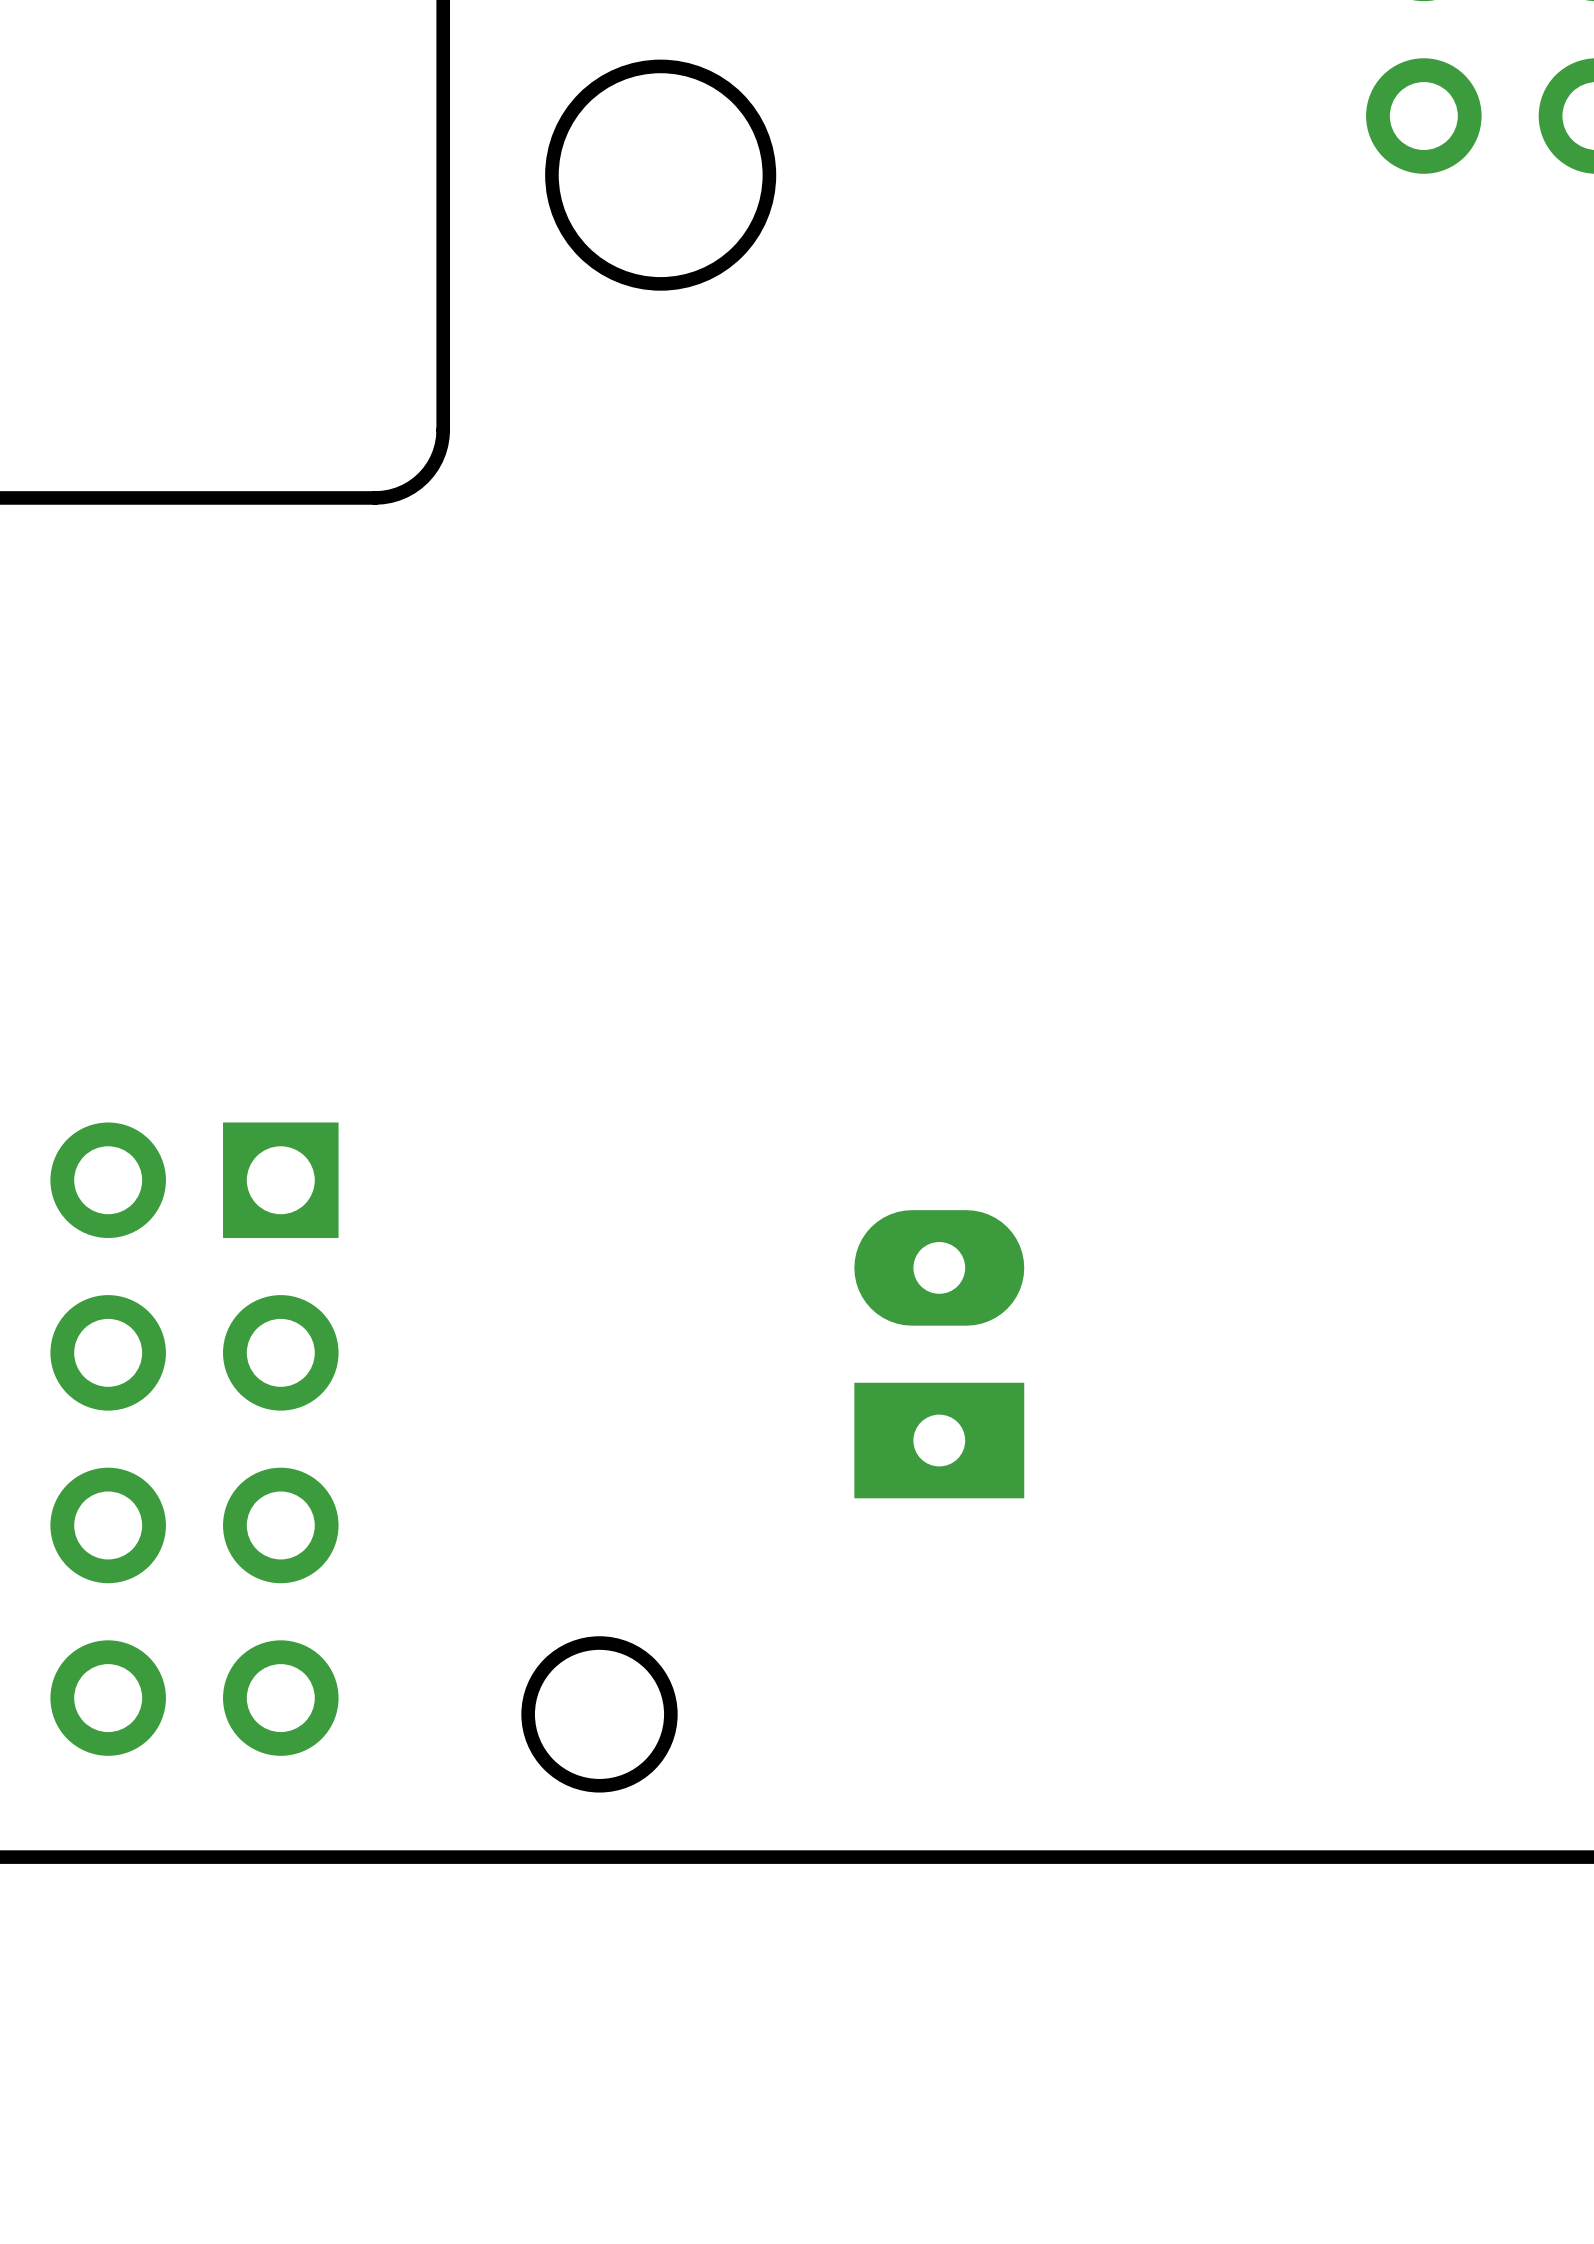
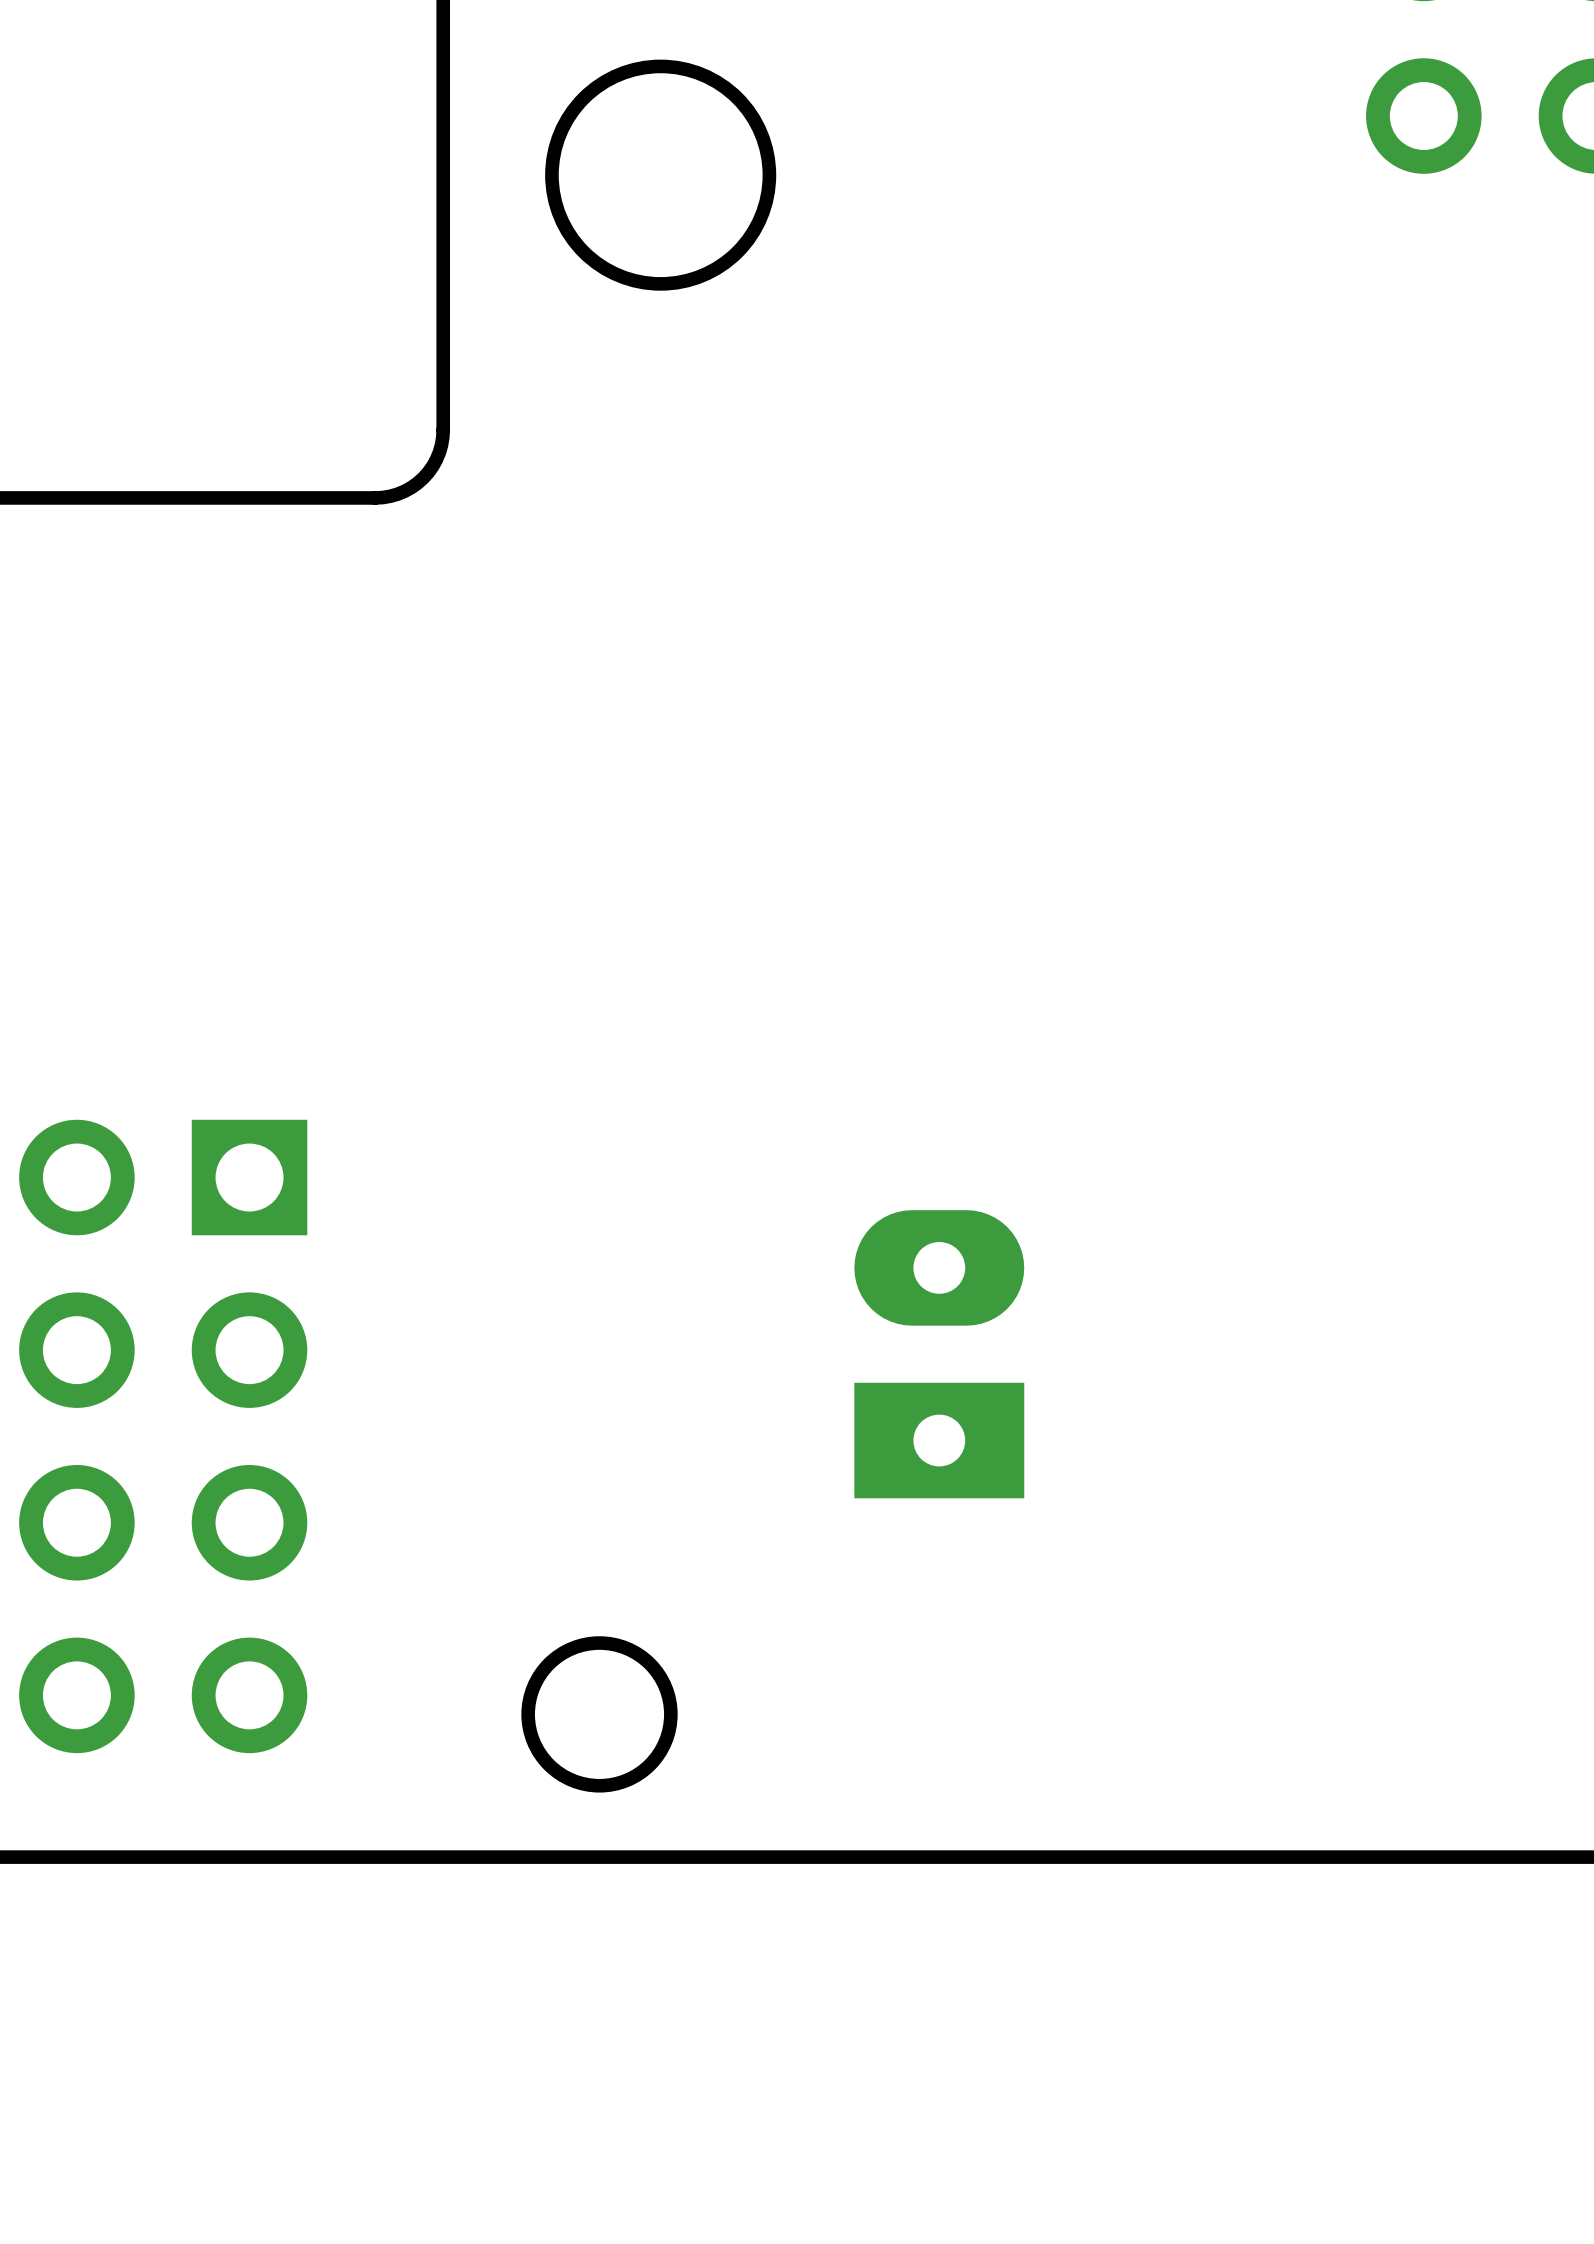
part position: (194, 1439) -> (163, 1436)

